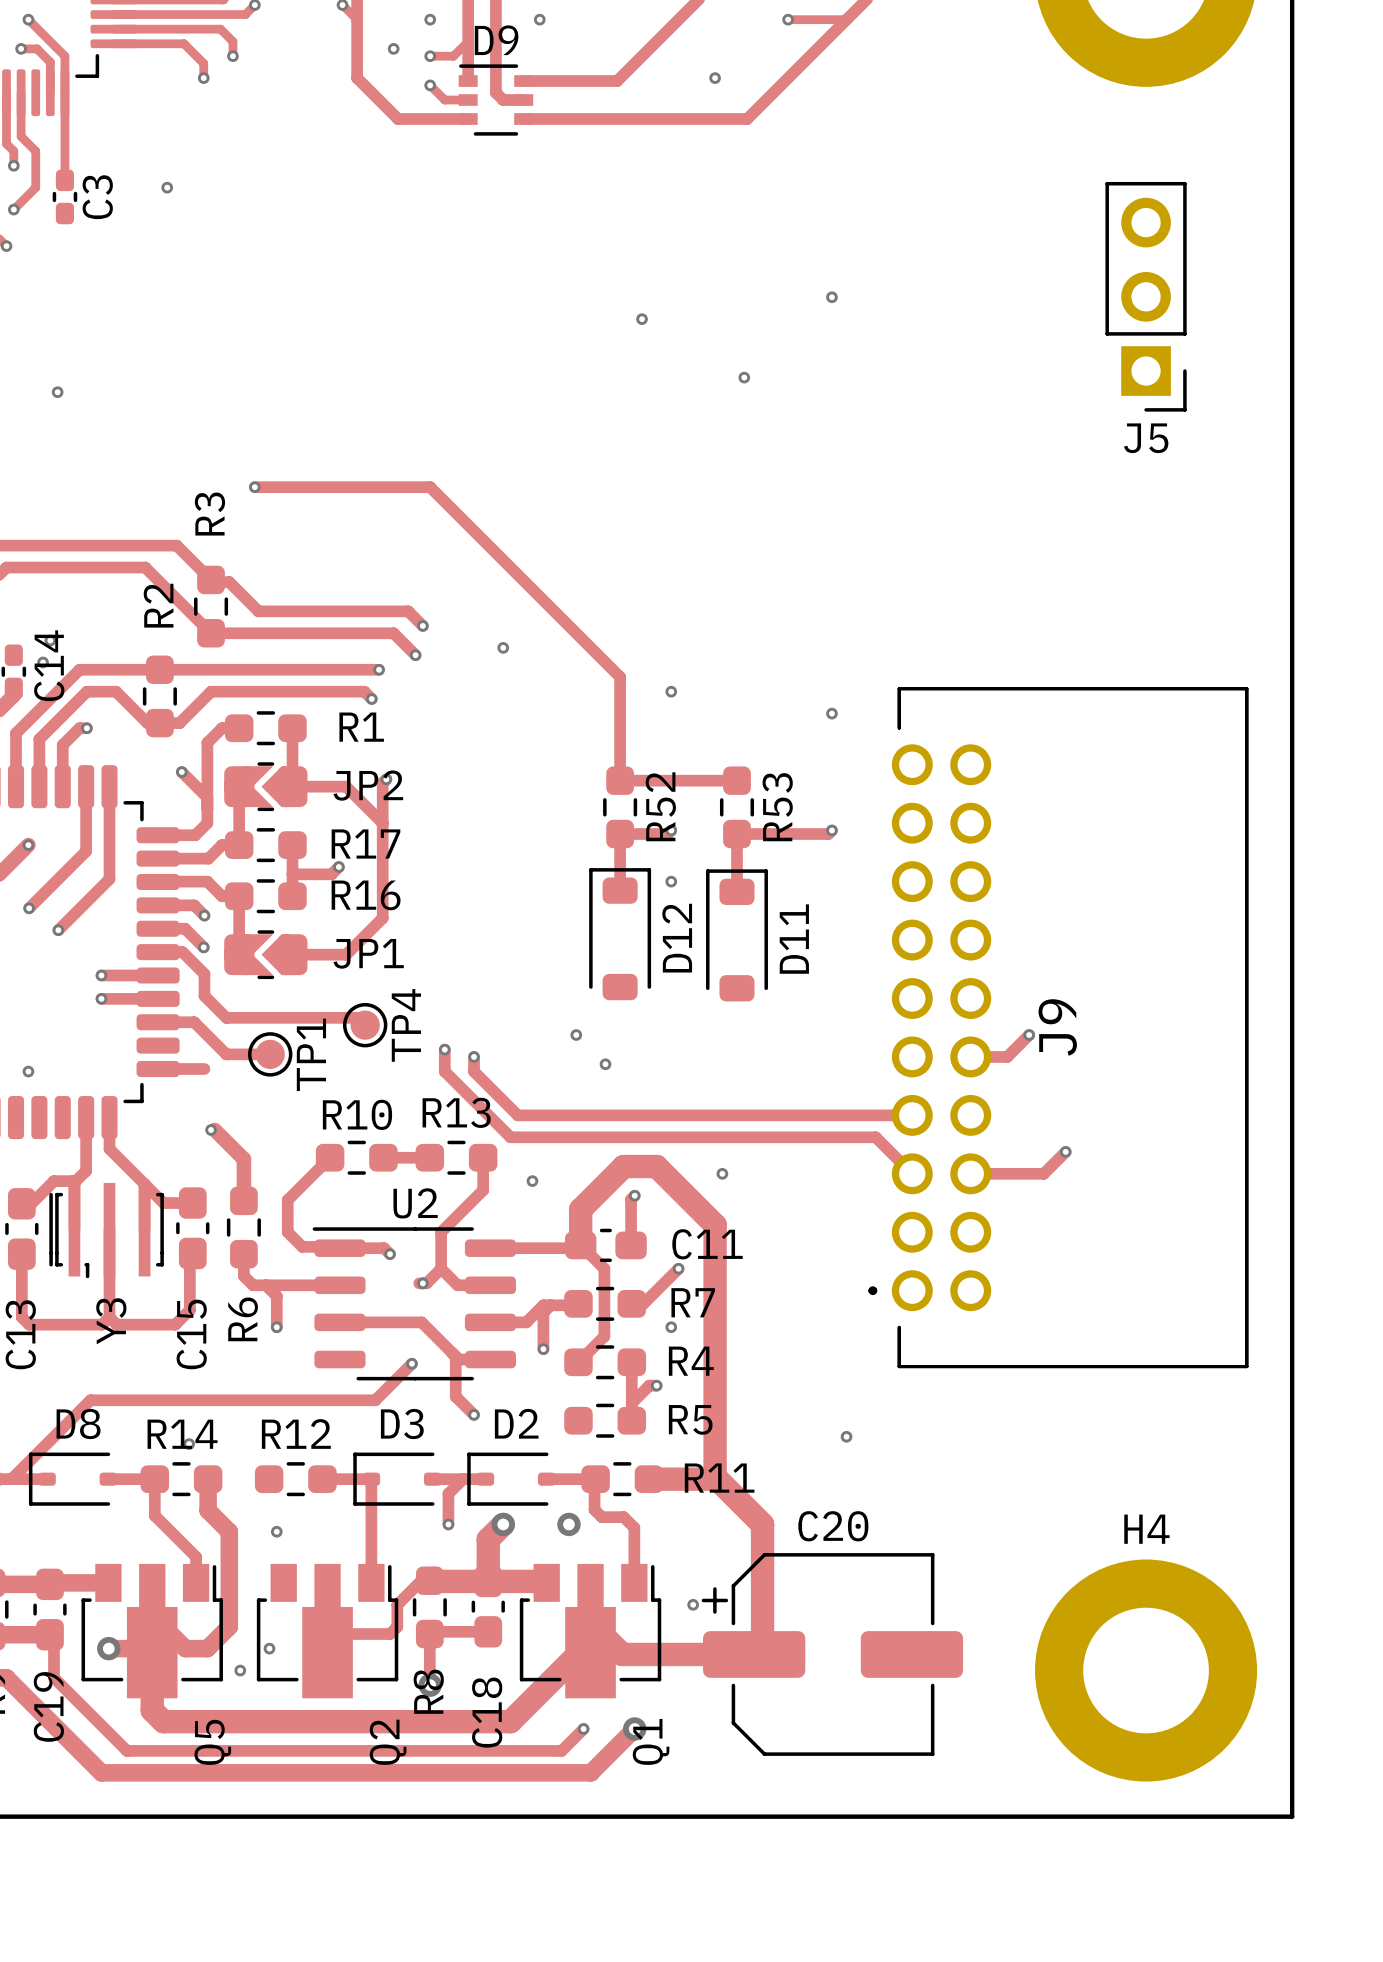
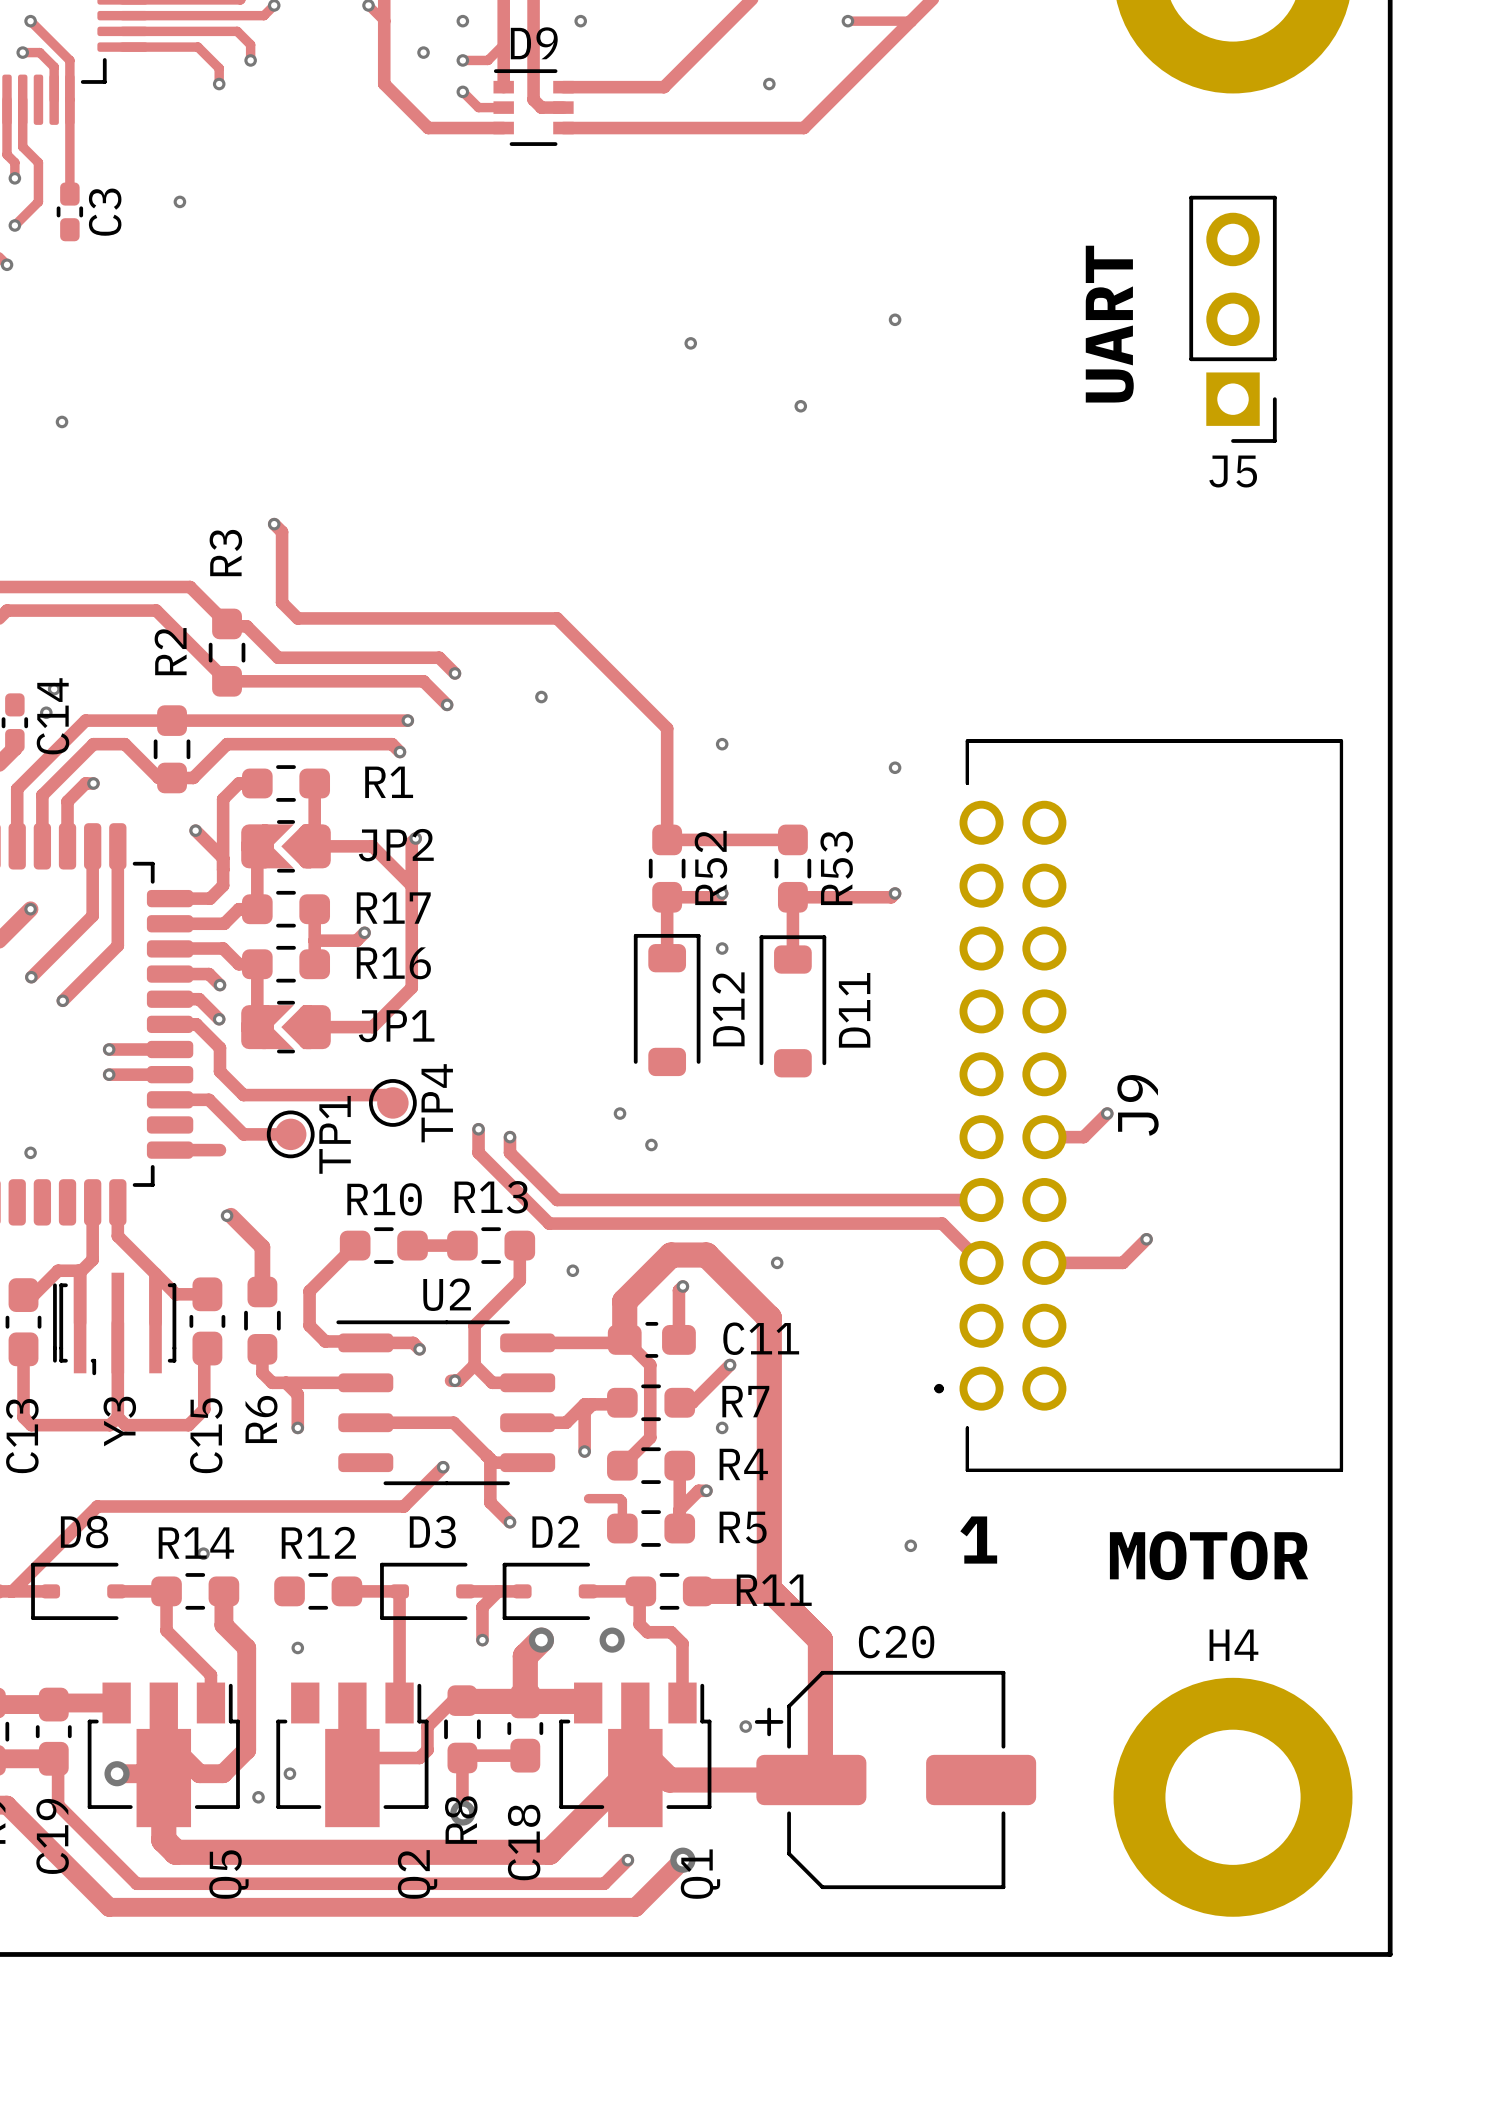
text: none -> UART (1109, 324)
track: (254, 487) (430, 487) (517, 574) -> (274, 524) (282, 531) (282, 602) (297, 618) (557, 618)
track: none -> (588, 1498) (620, 1498) (622, 1501) (622, 1528)
text: none -> 1 (978, 1540)
text: none -> MOTOR (1209, 1555)

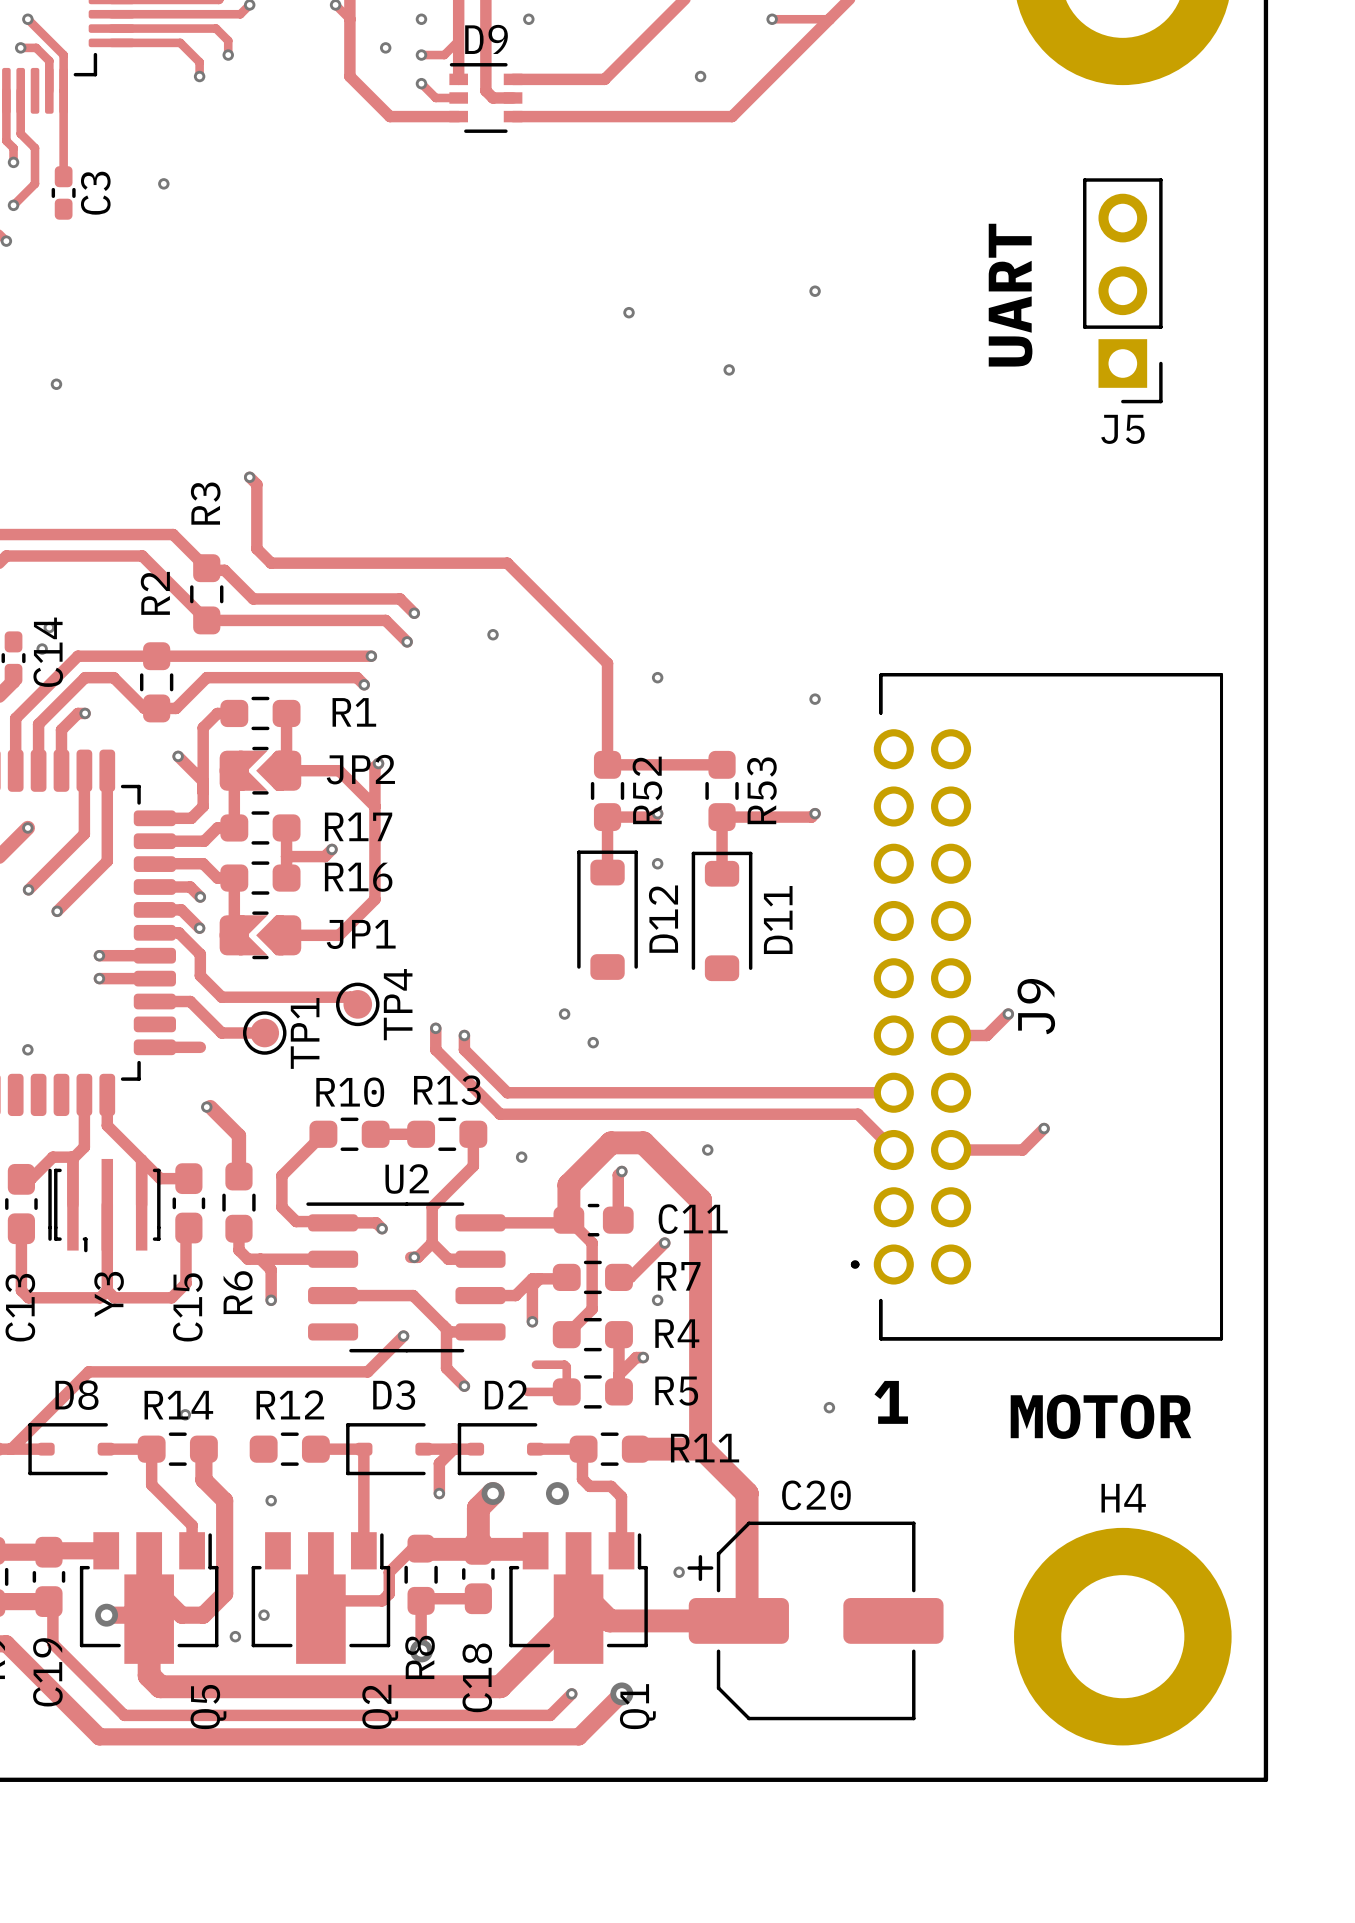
track: none -> (527, 1391) (566, 1391)

